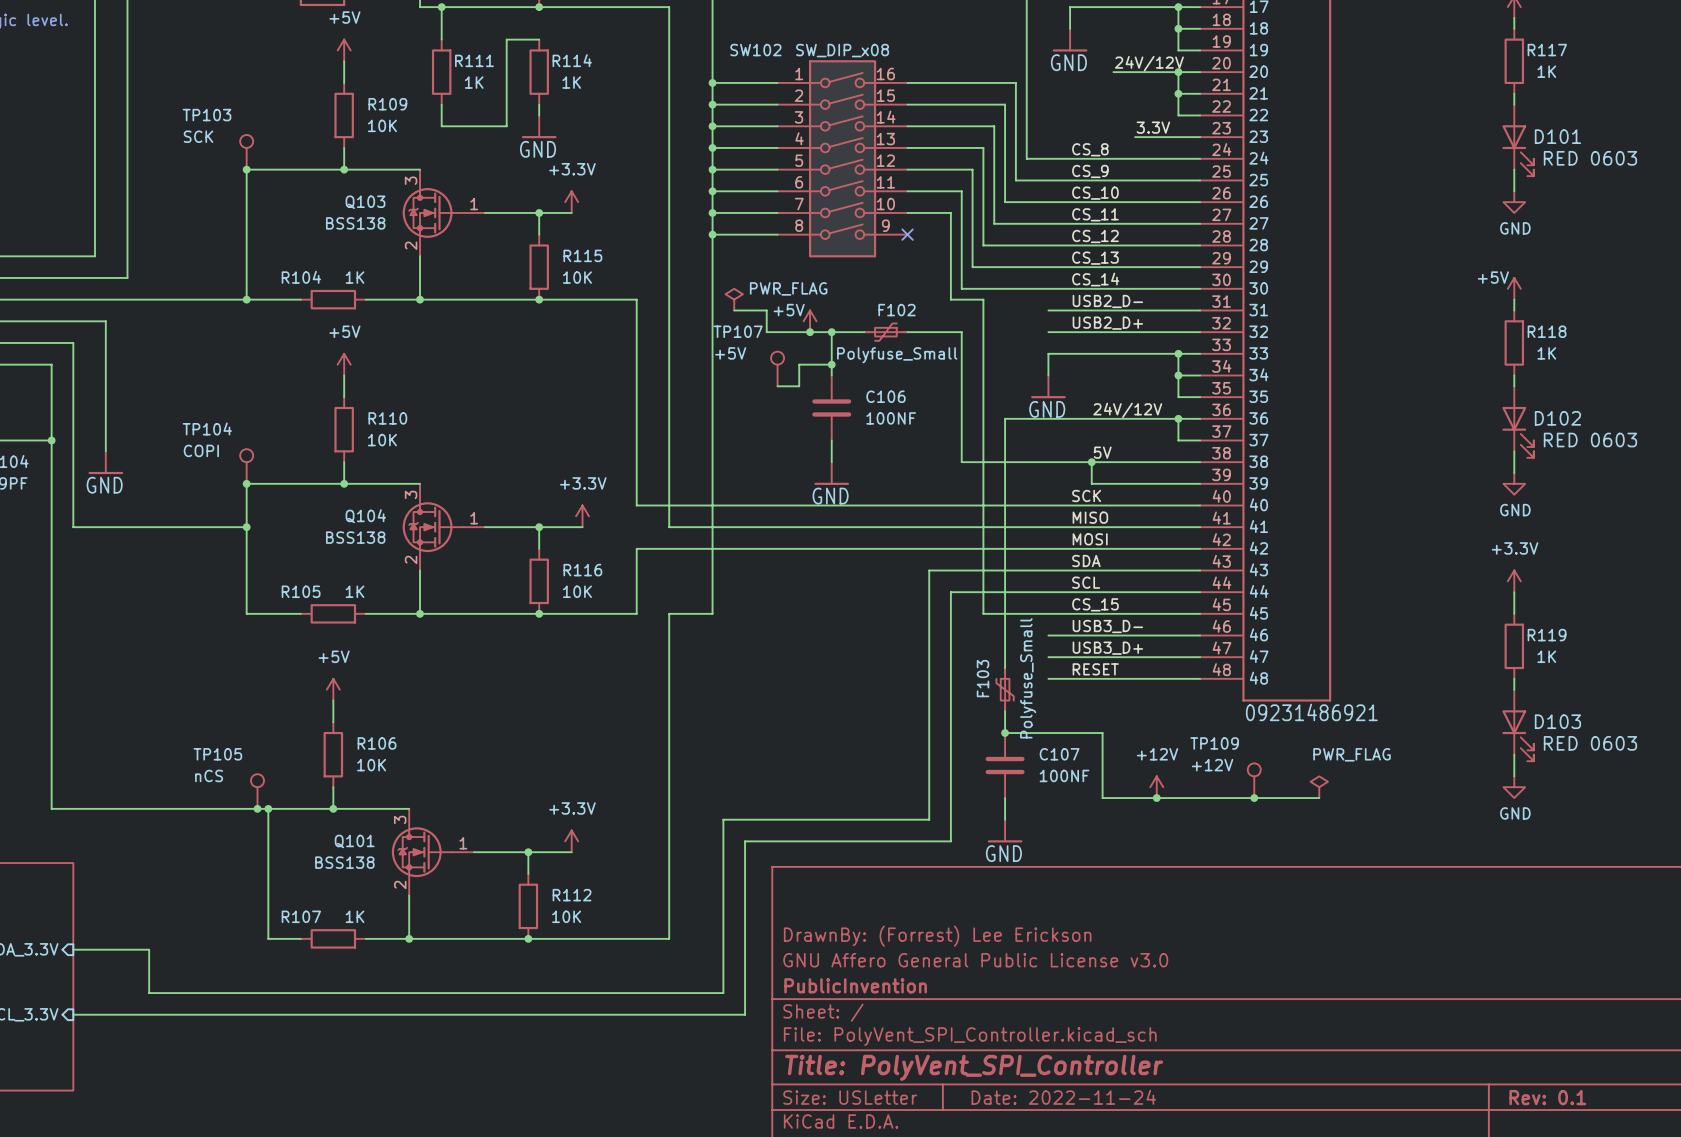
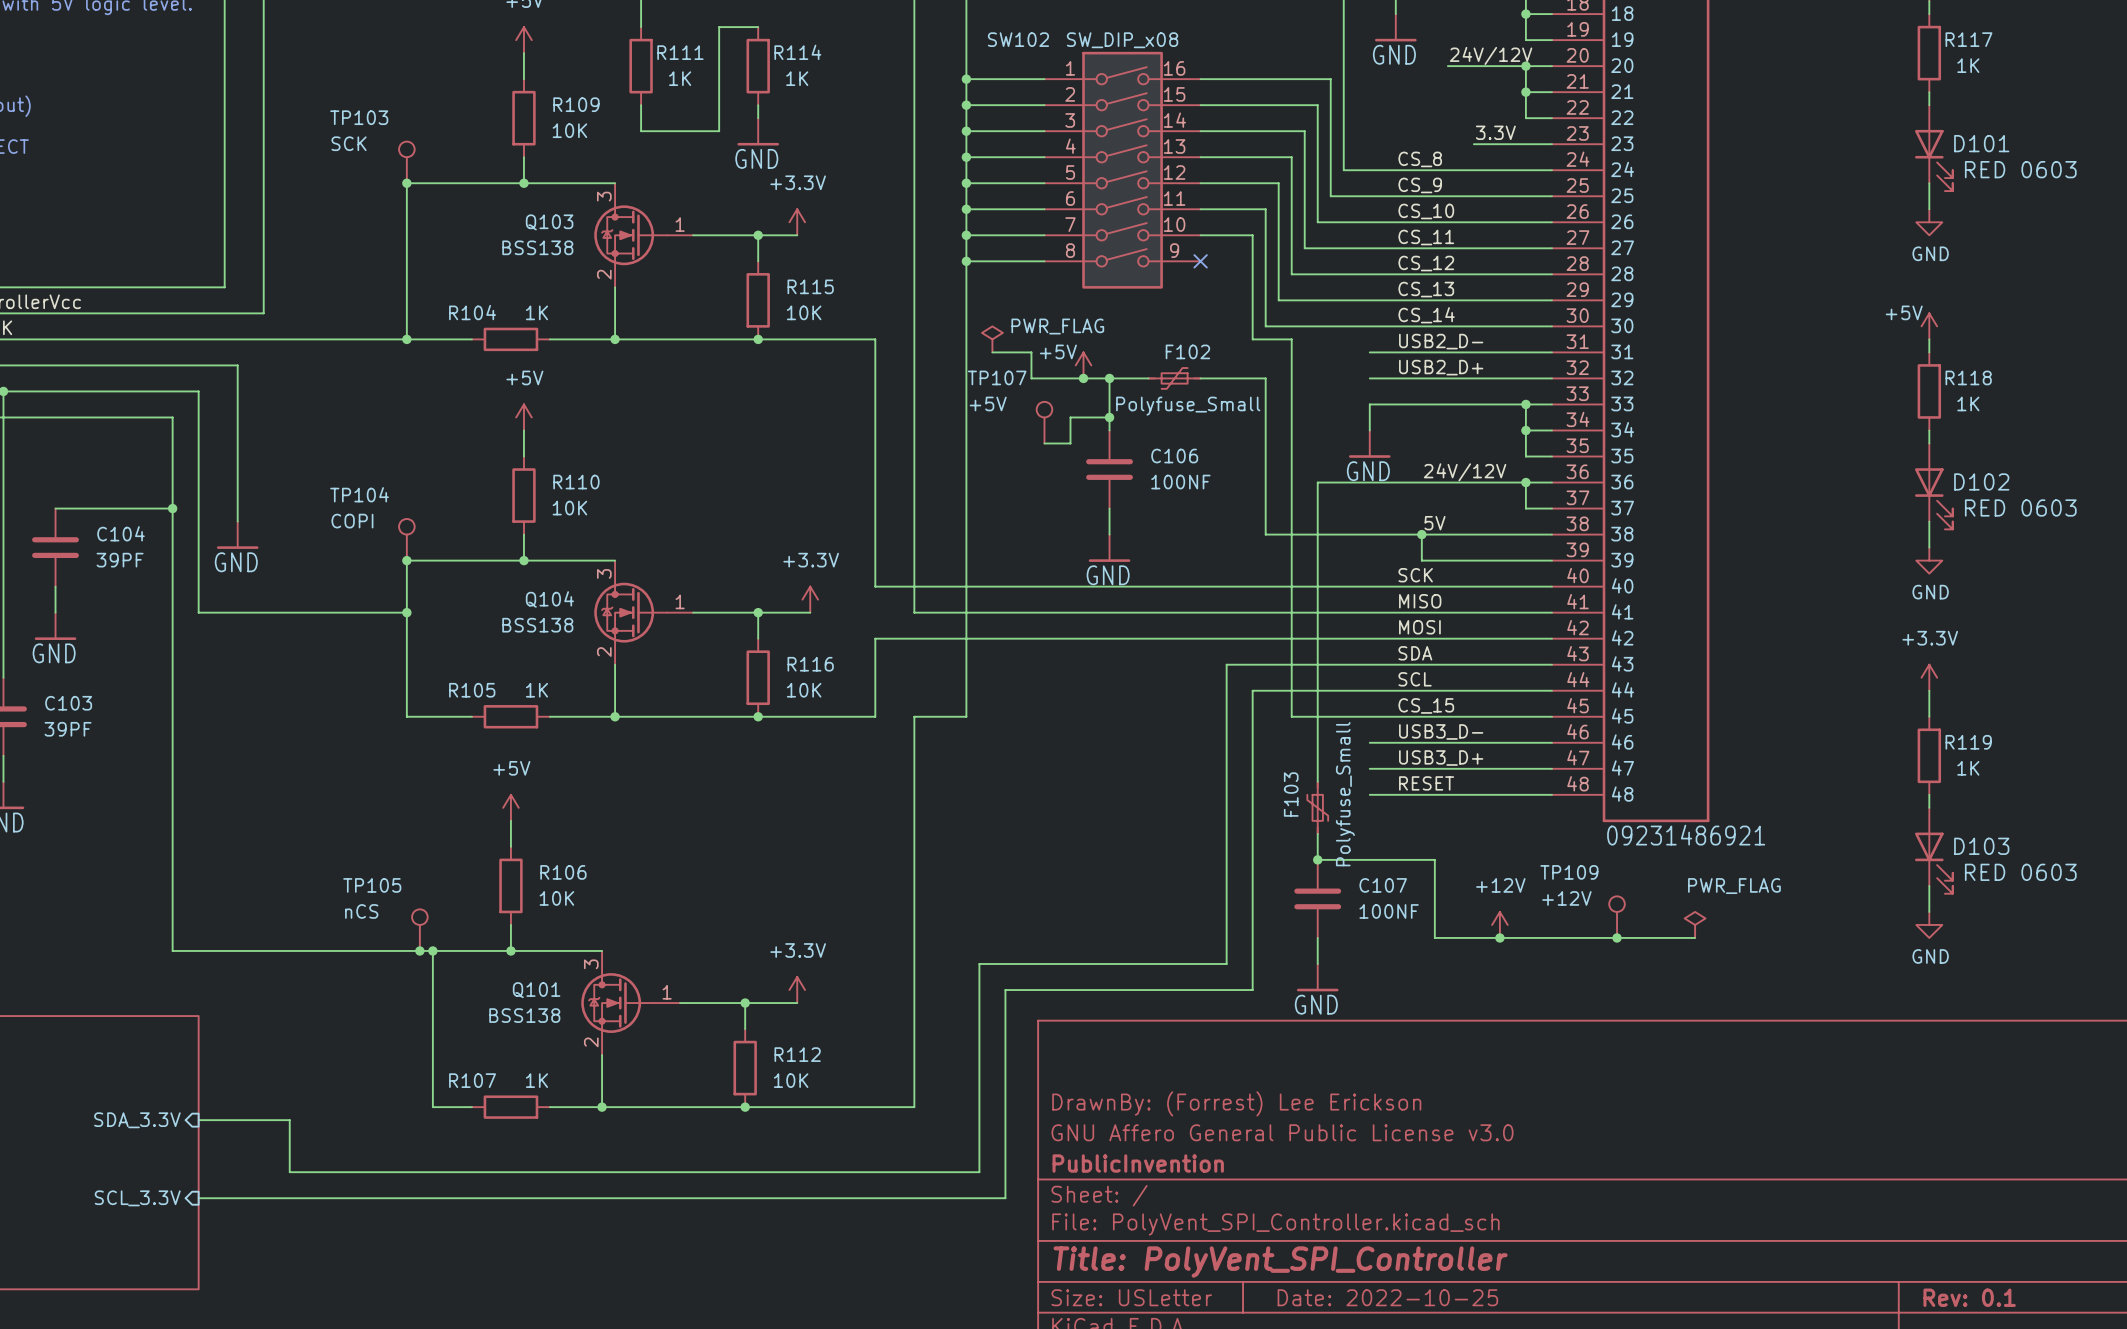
title block: Date: 2022-11-24 (1063, 1097) -> Date: 2022-10-25 (1387, 1297)

